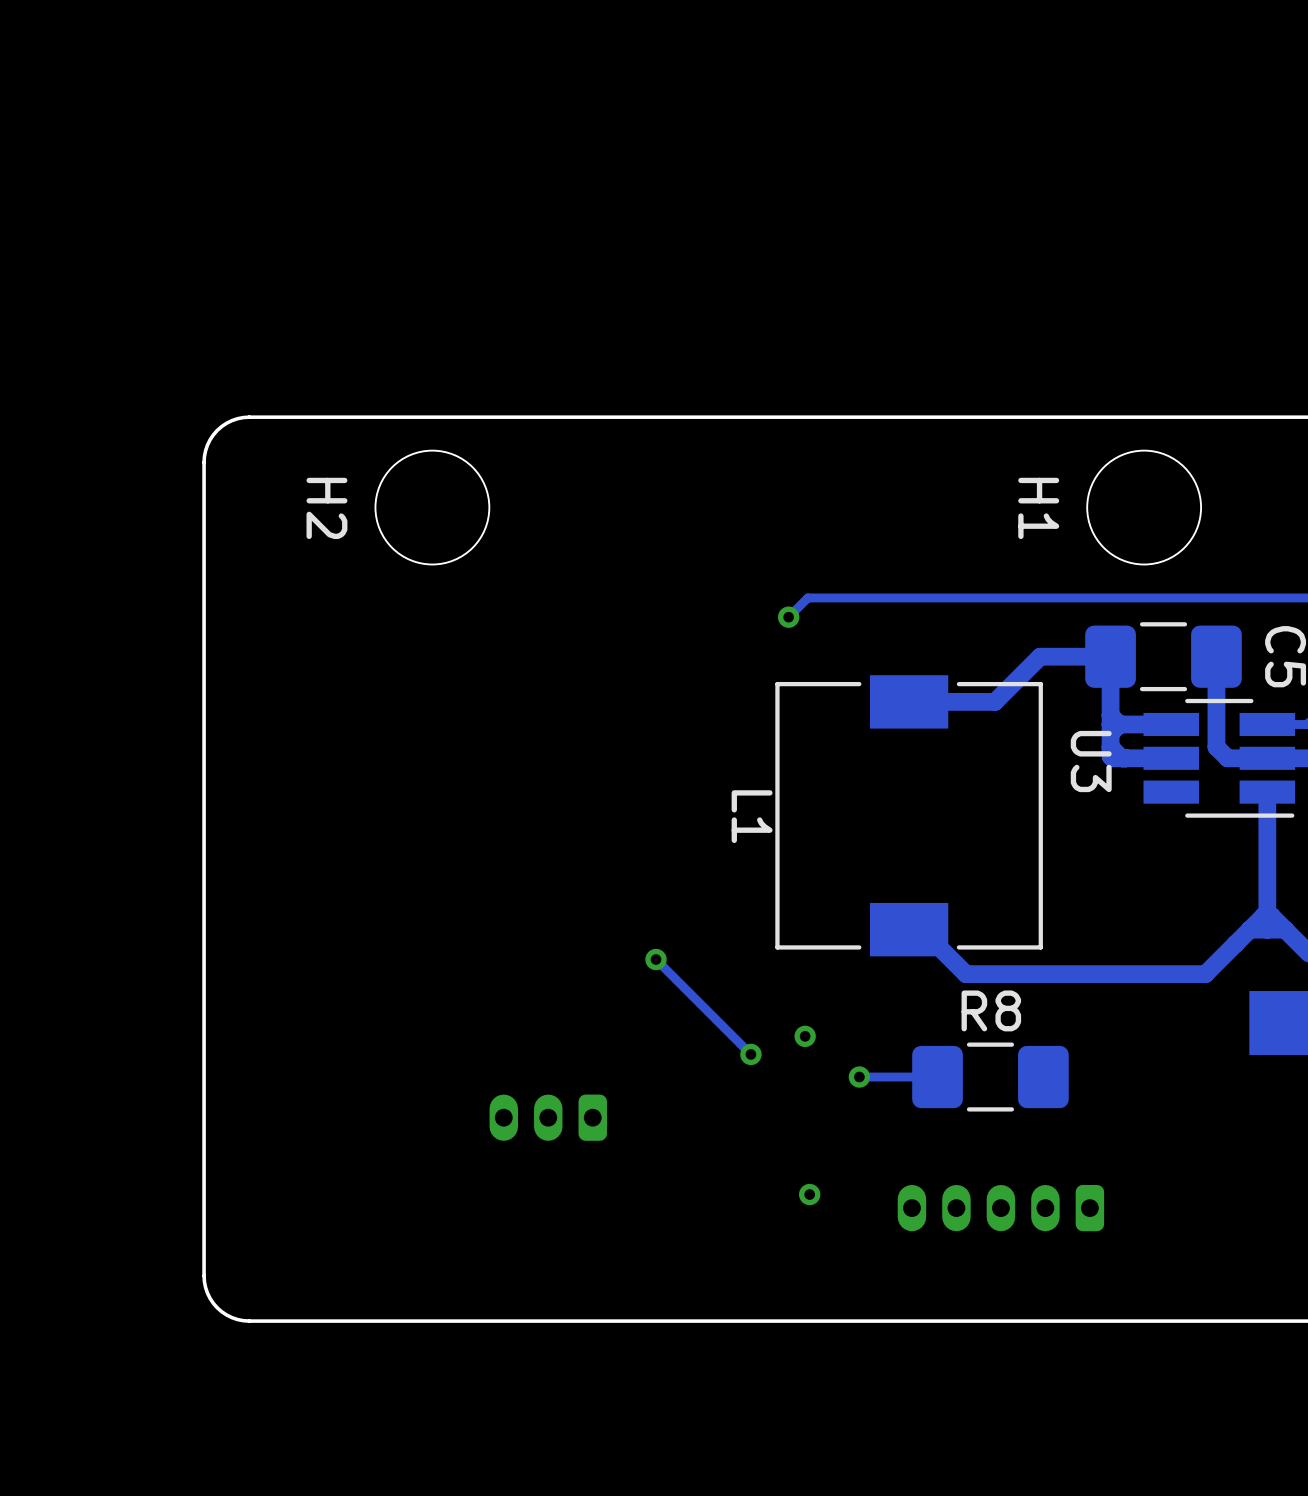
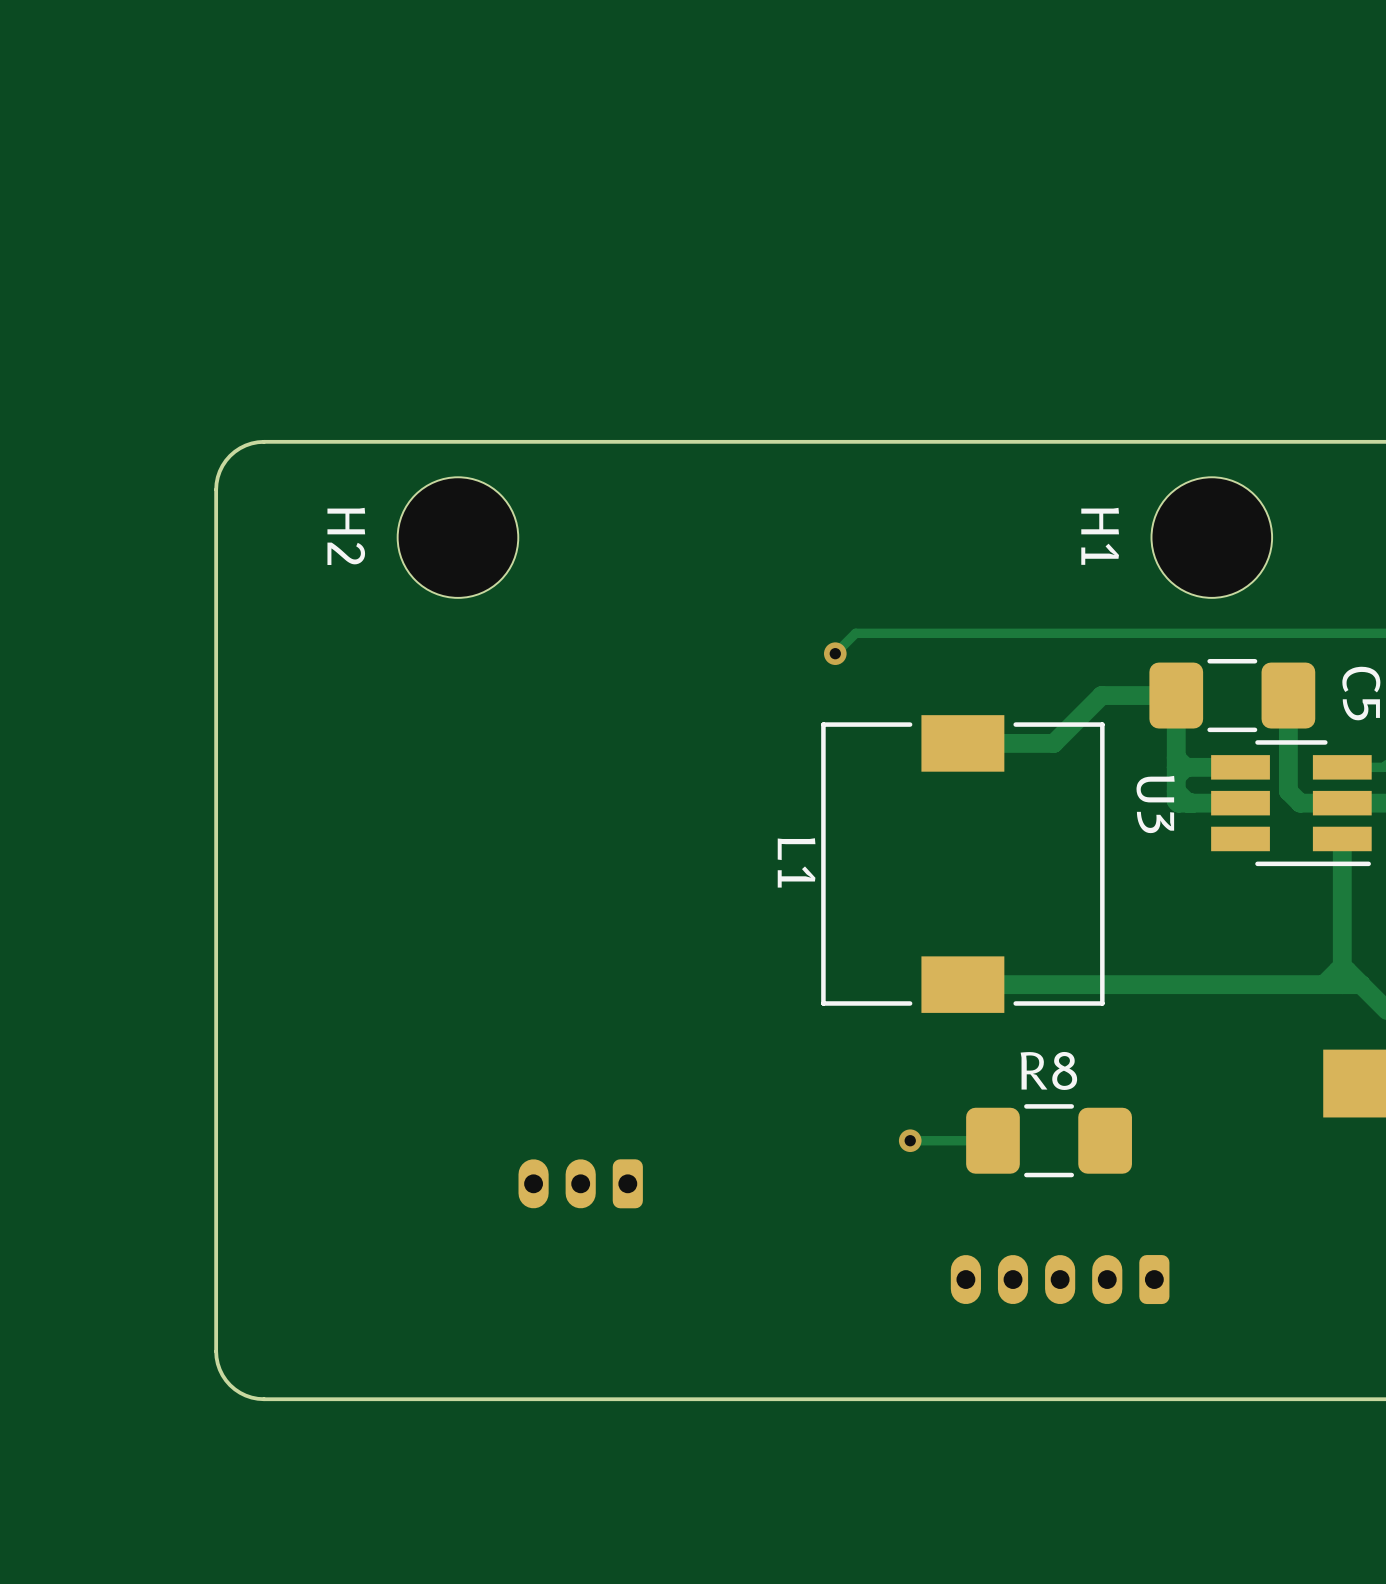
track: (1249, 929) (1205, 974) (966, 974) (921, 929) -> (1323, 984) (976, 984)
track: (656, 959) (750, 1054) -> none
via: (656, 959) -> none
via: (805, 1036) -> none
via: (750, 1054) -> none
via: (809, 1194) -> none

